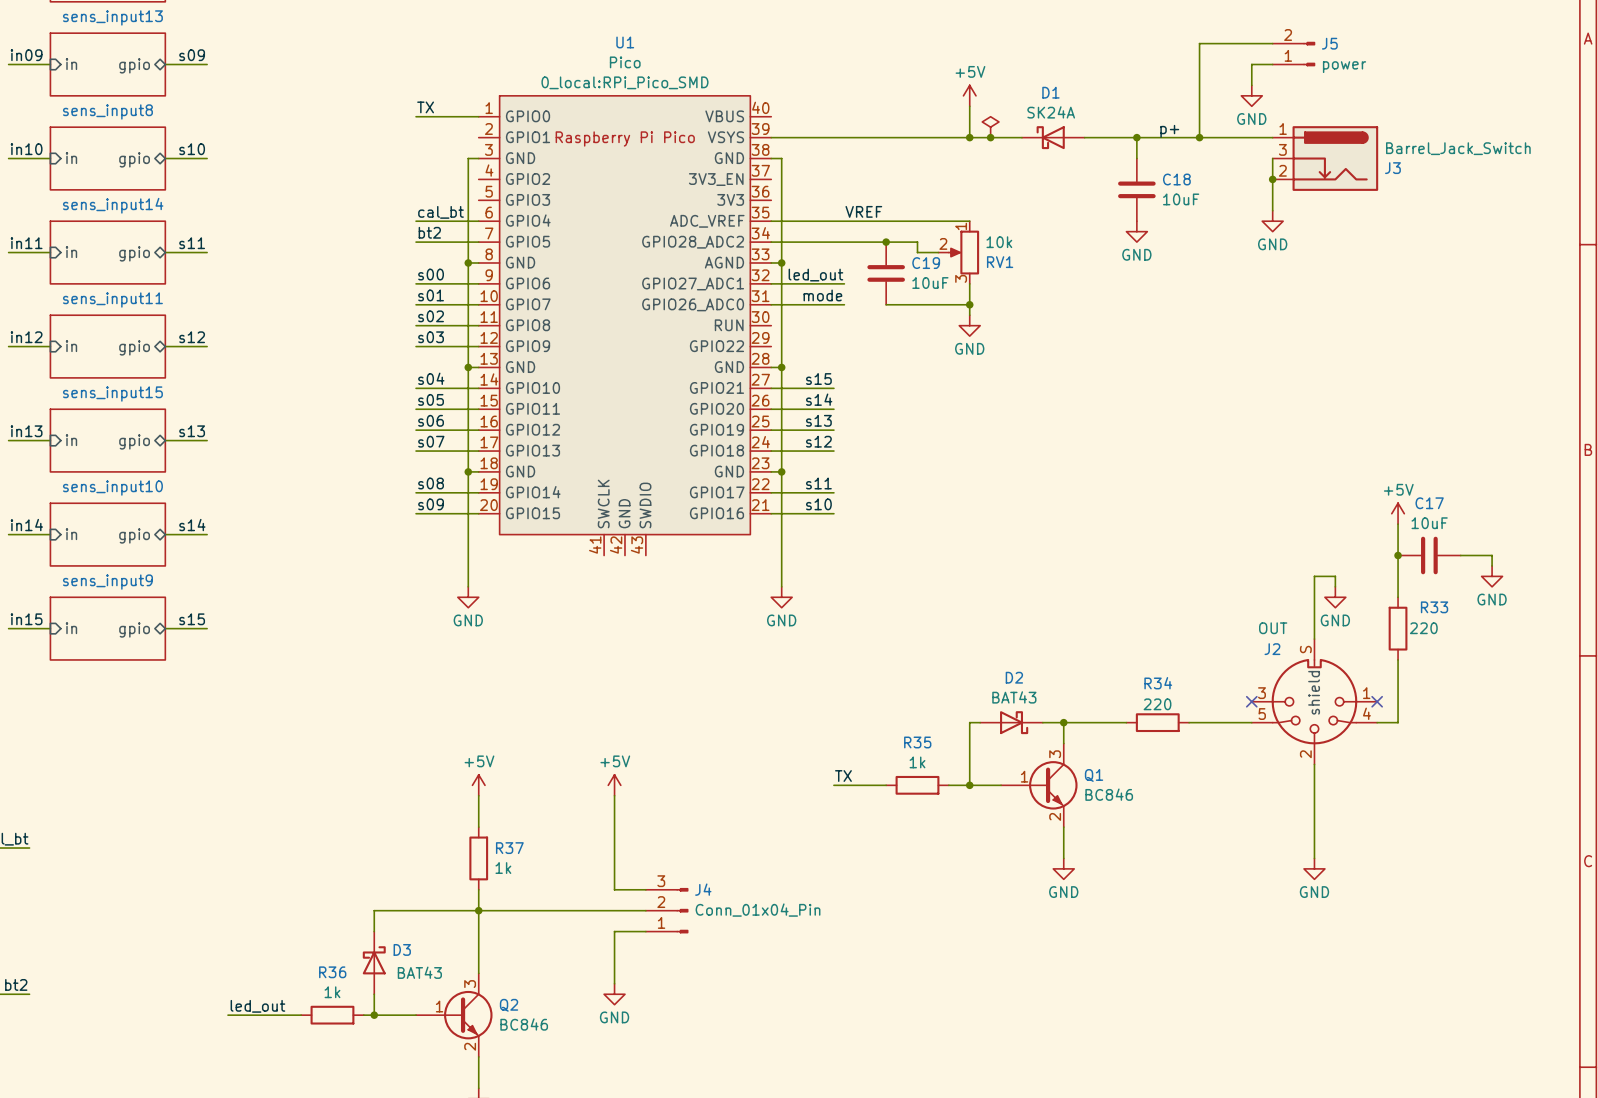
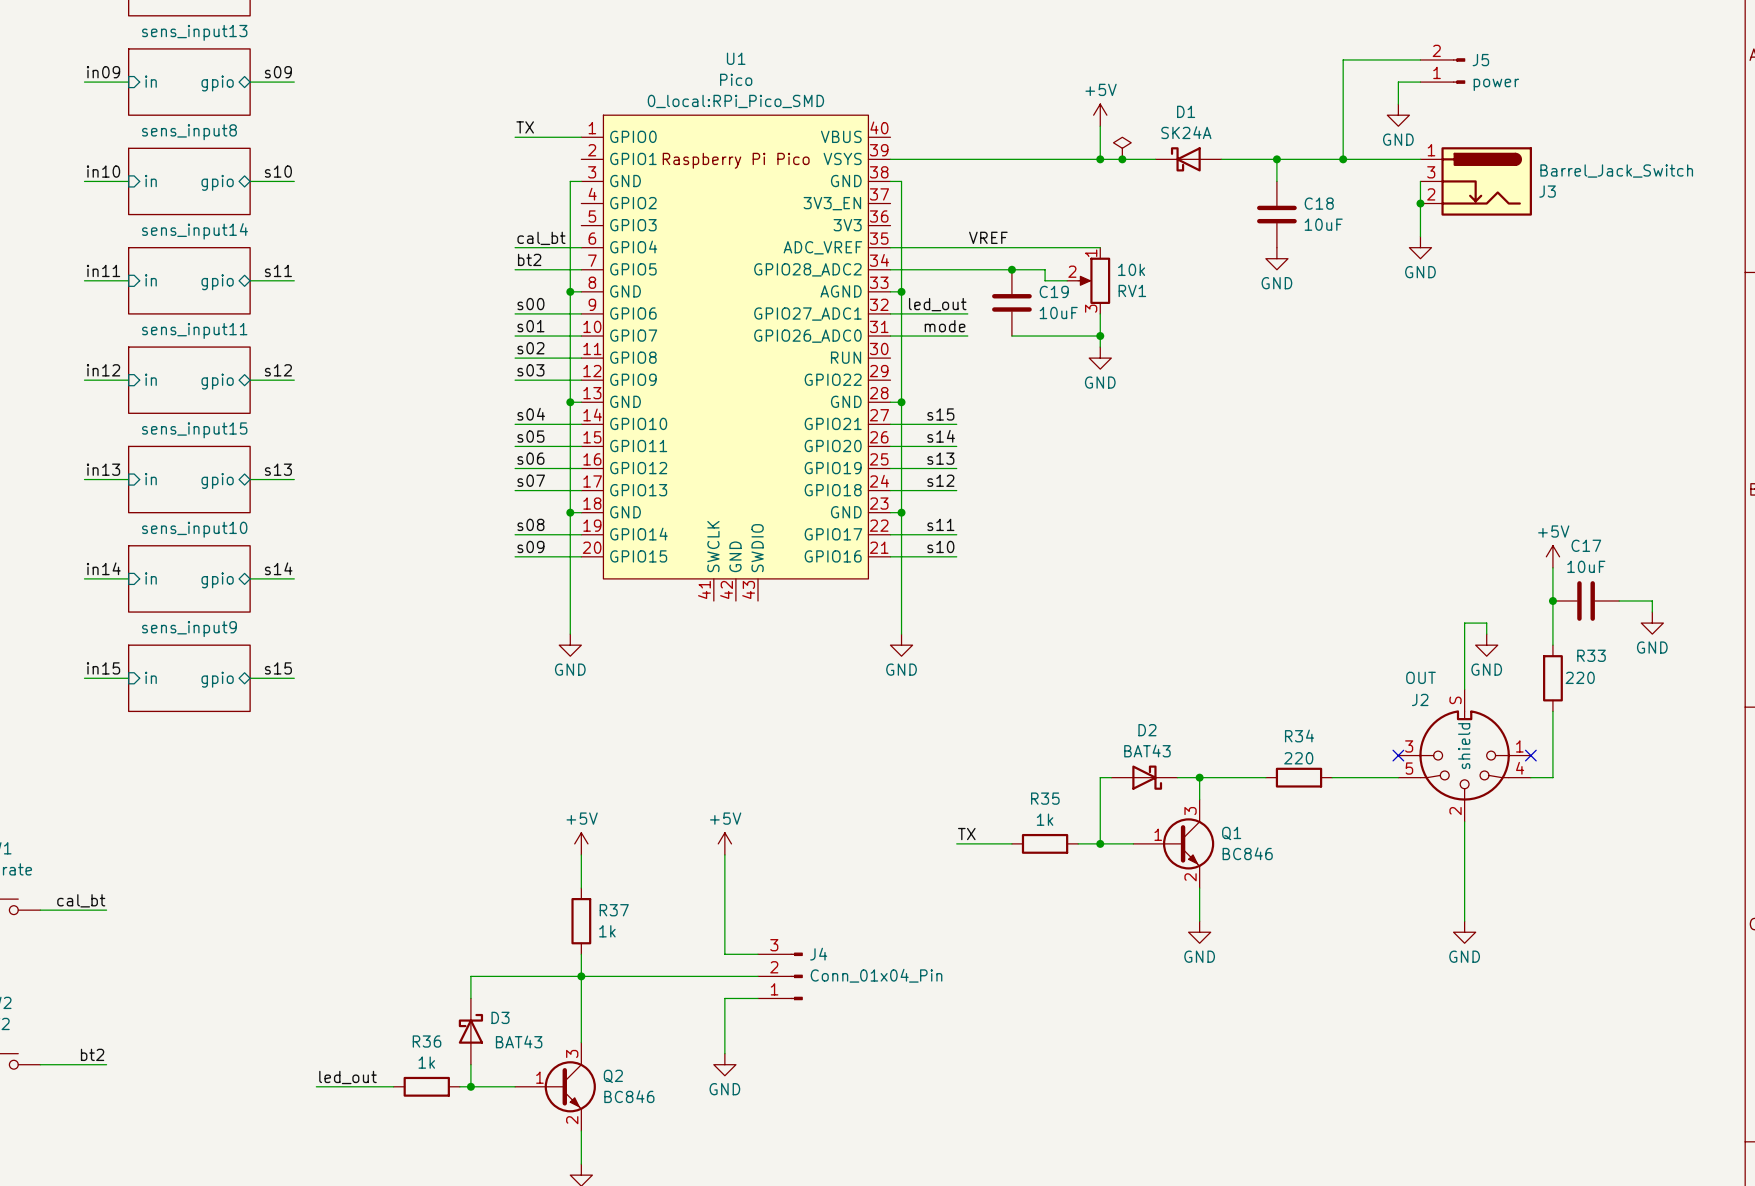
label: p+ (1169, 131) -> none

